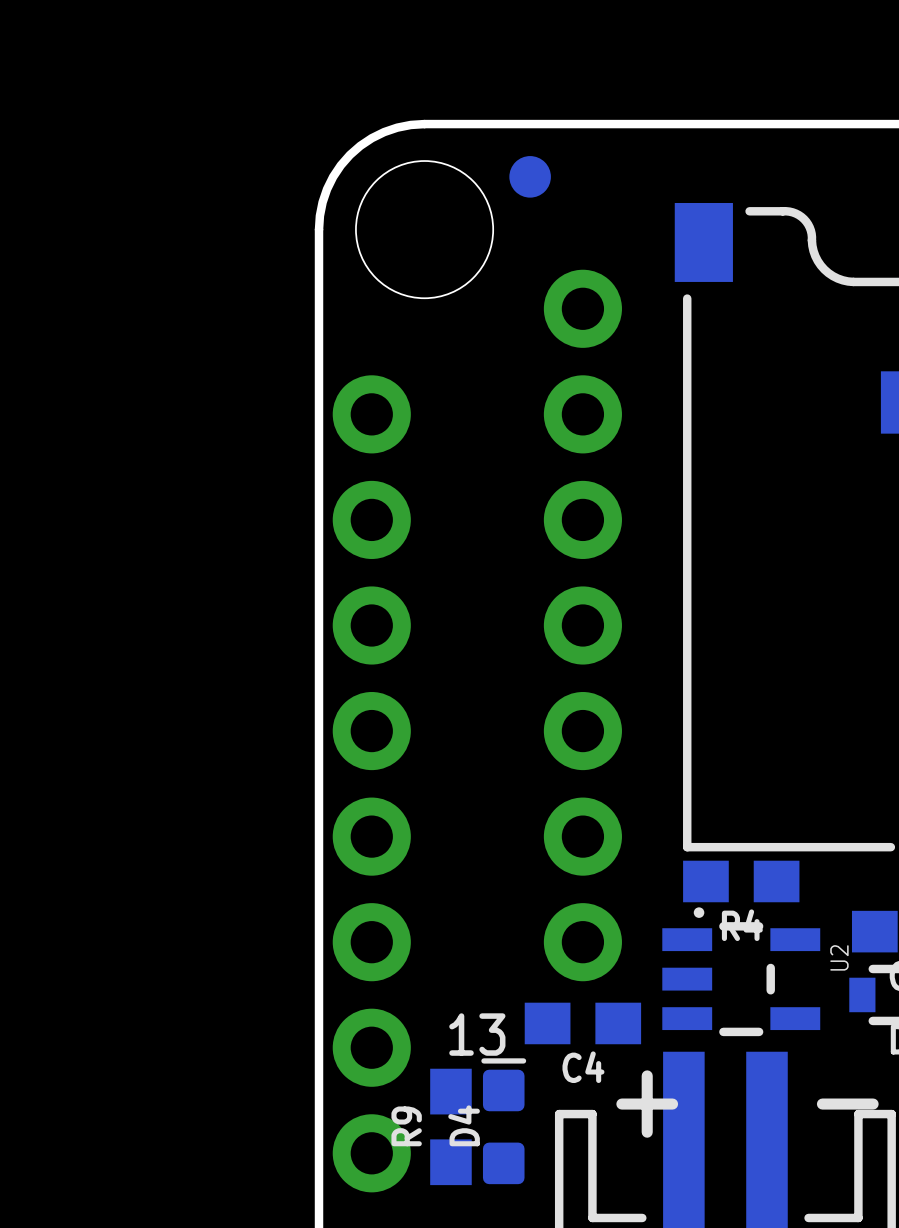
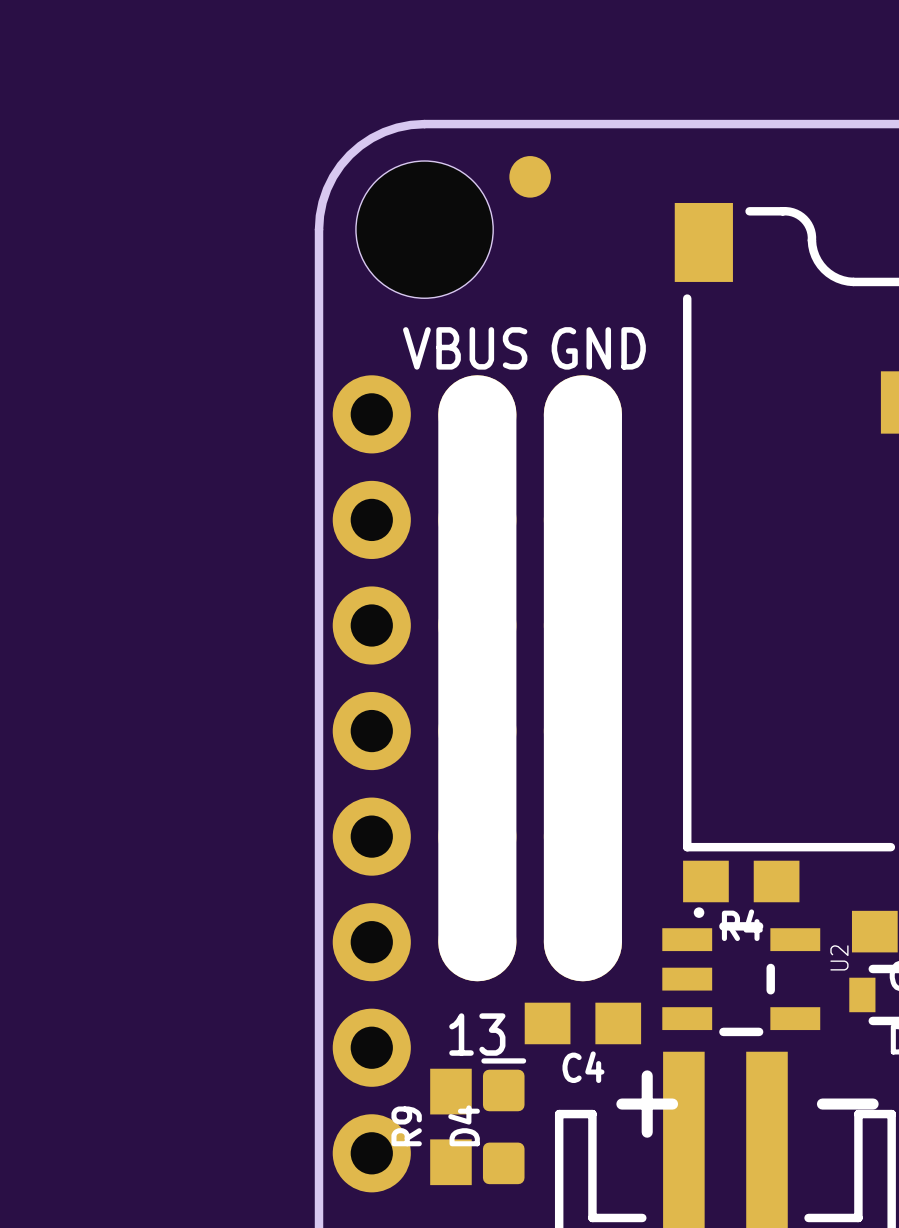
text: none -> VBUS (465, 348)
text: none -> GND (598, 348)
line: none -> (477, 414) (477, 942)
line: none -> (582, 414) (582, 942)
part: (582, 625) -> none

